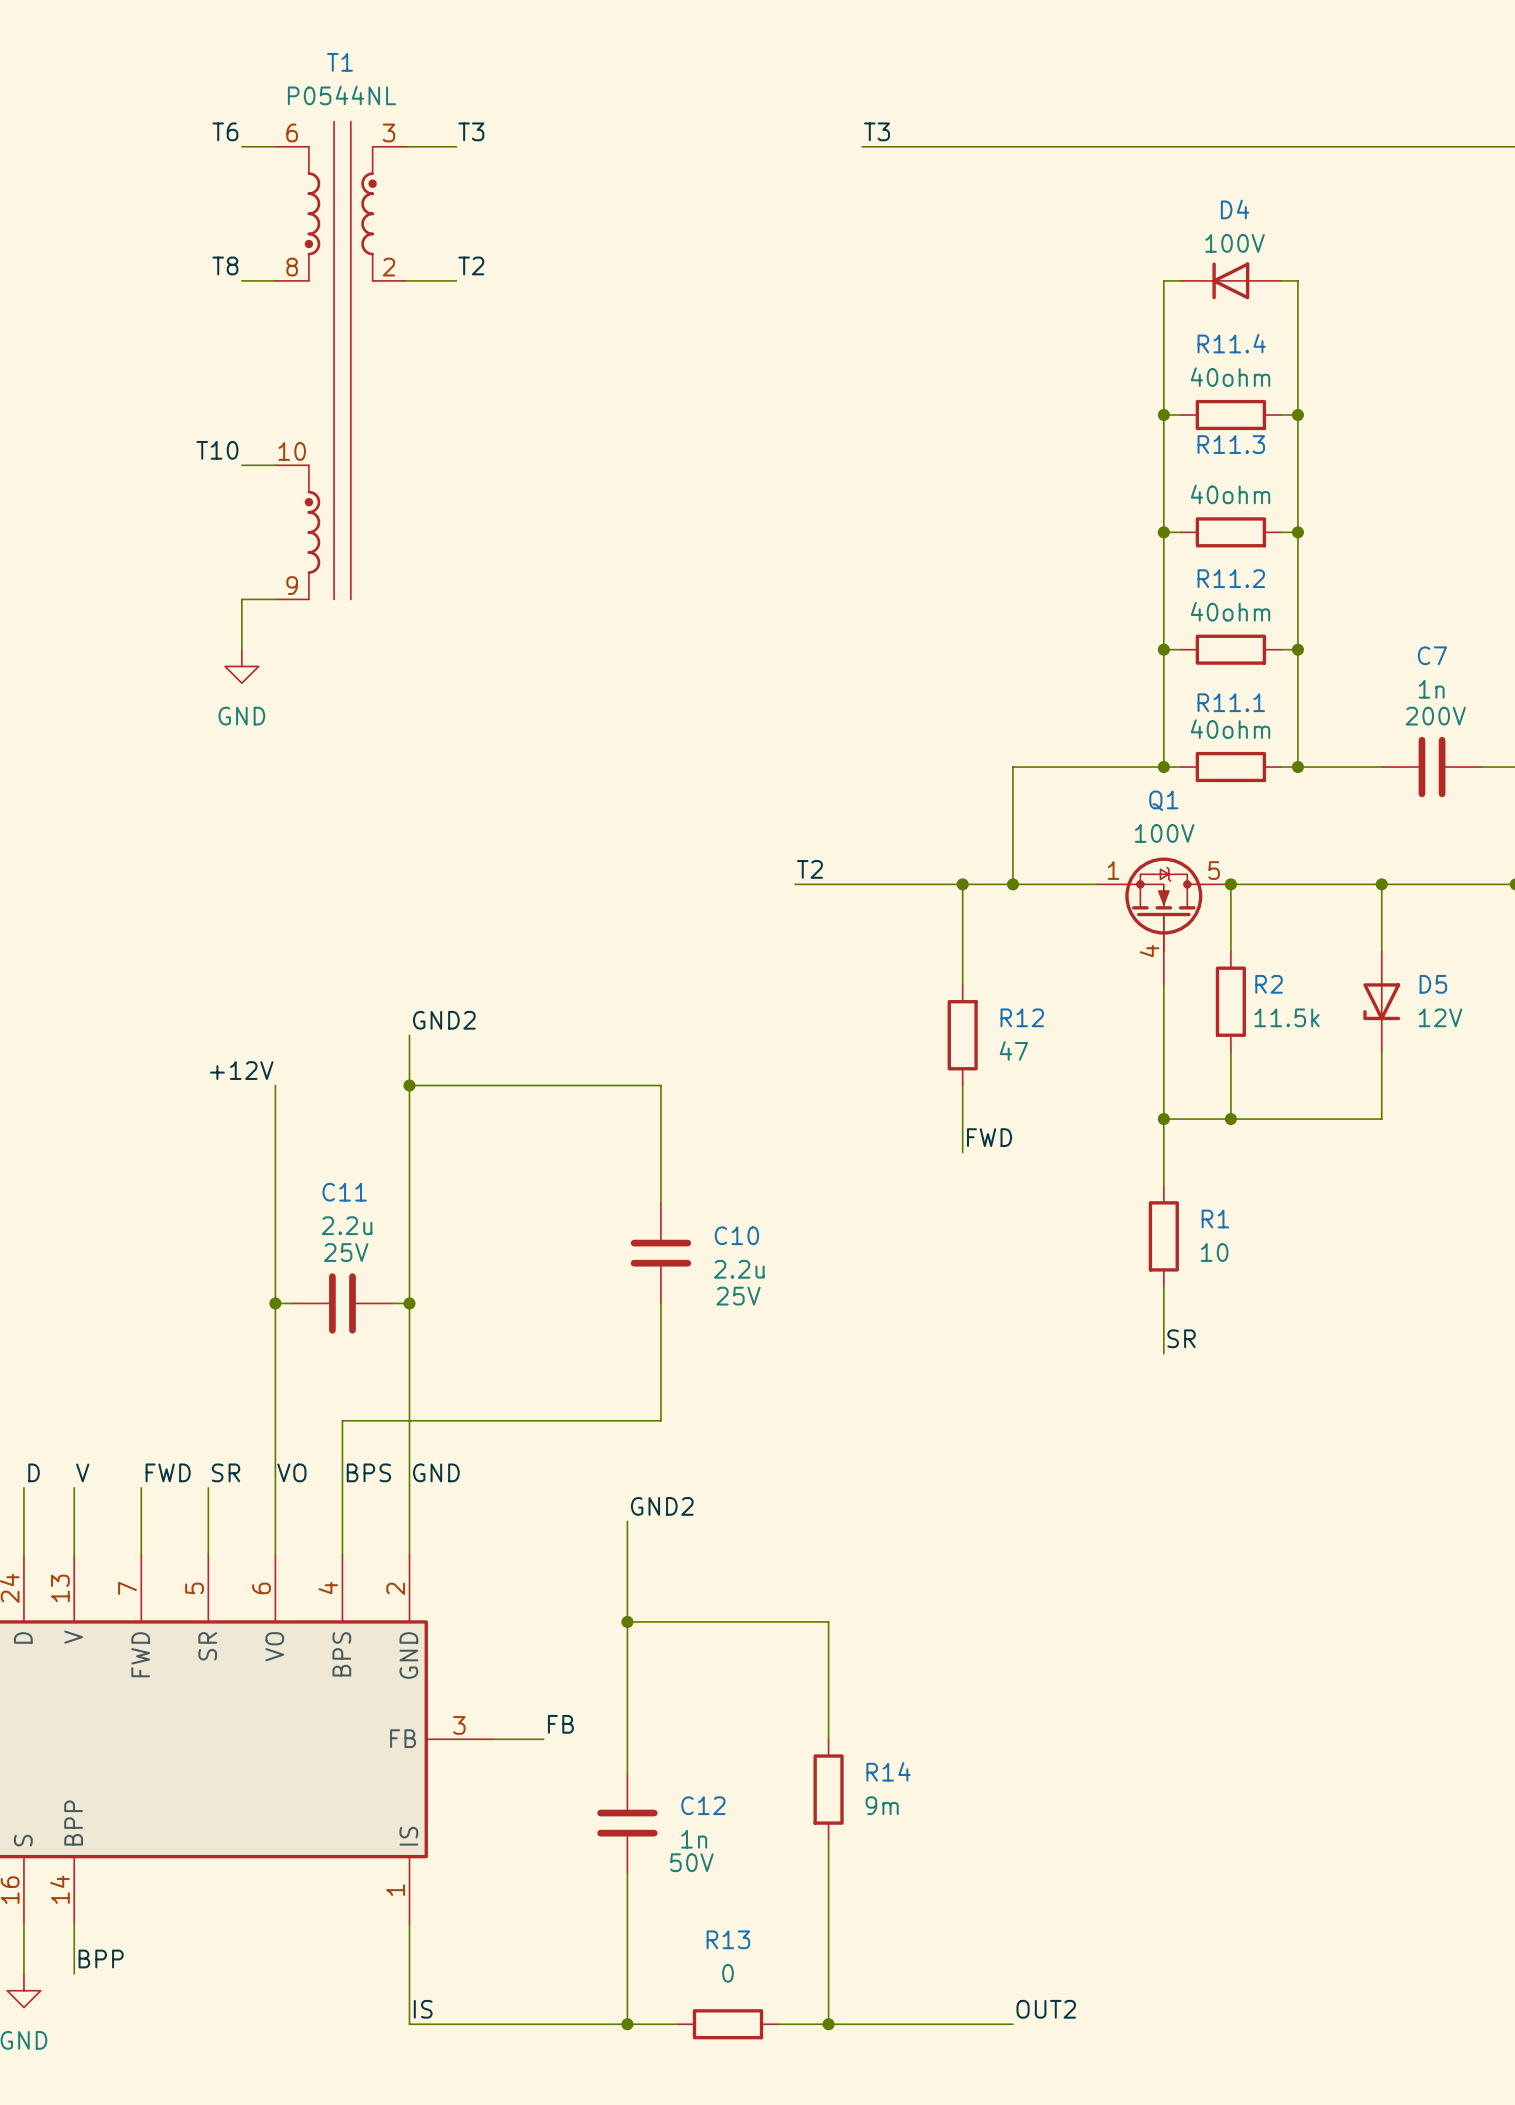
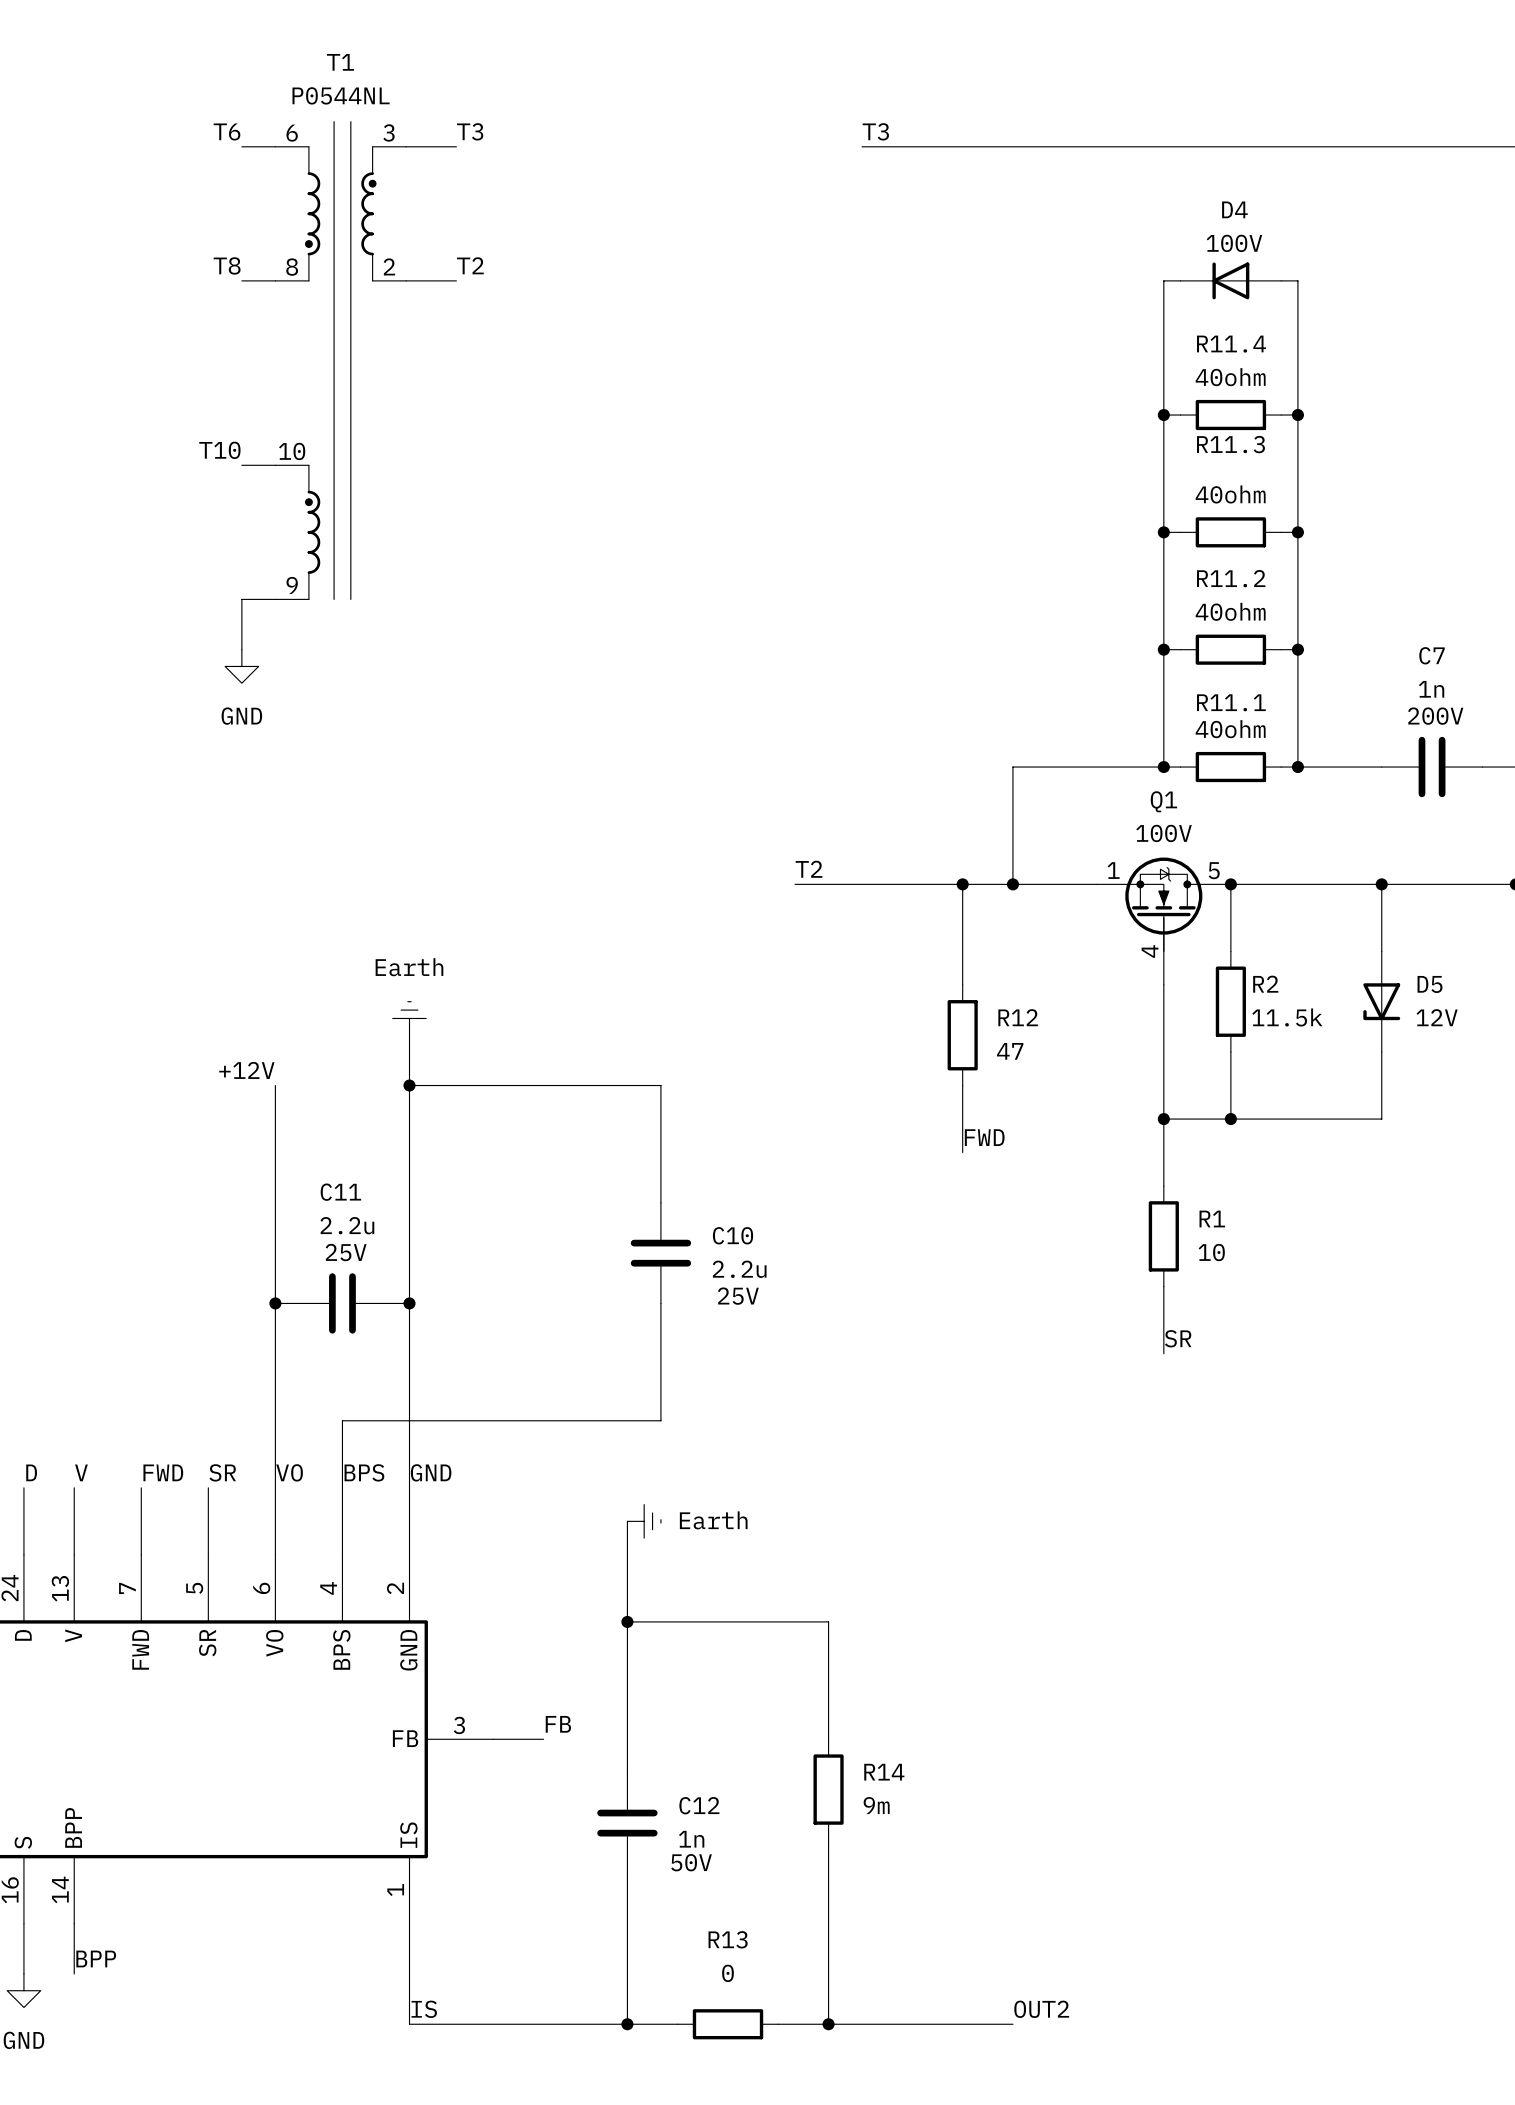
power symbol: none -> Earth (409, 1018)
label: GND2 (444, 1020) -> none
label: GND2 (662, 1506) -> none
power symbol: none -> Earth (644, 1521)

